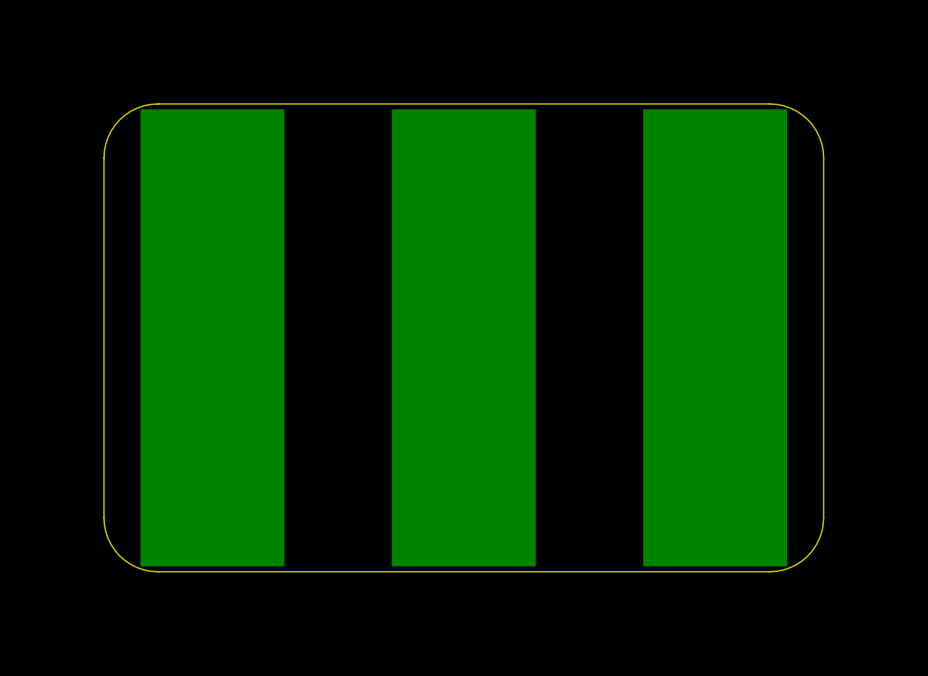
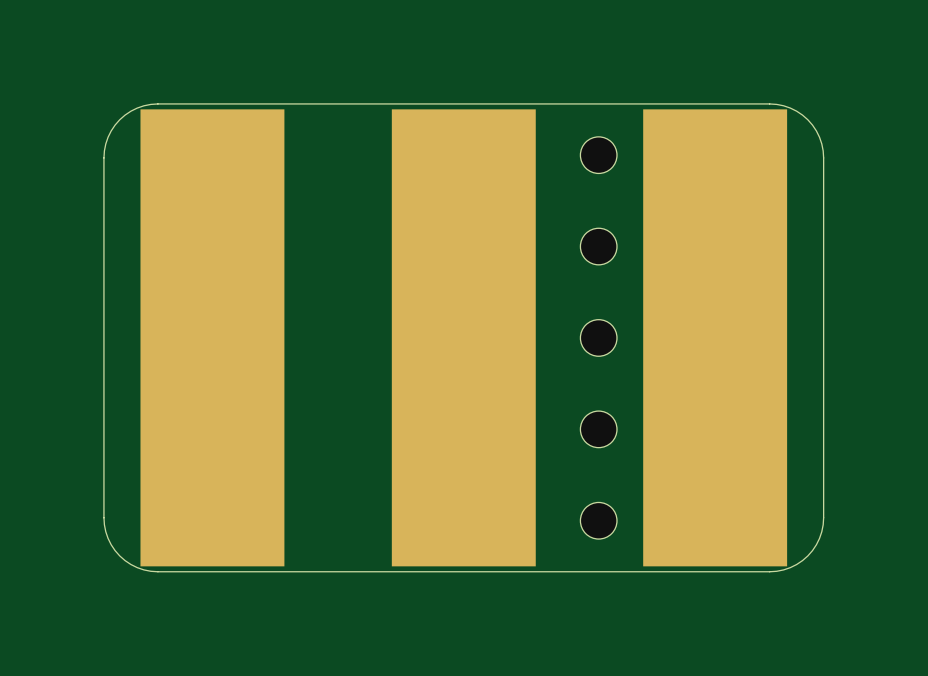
part: none -> (598, 337)

